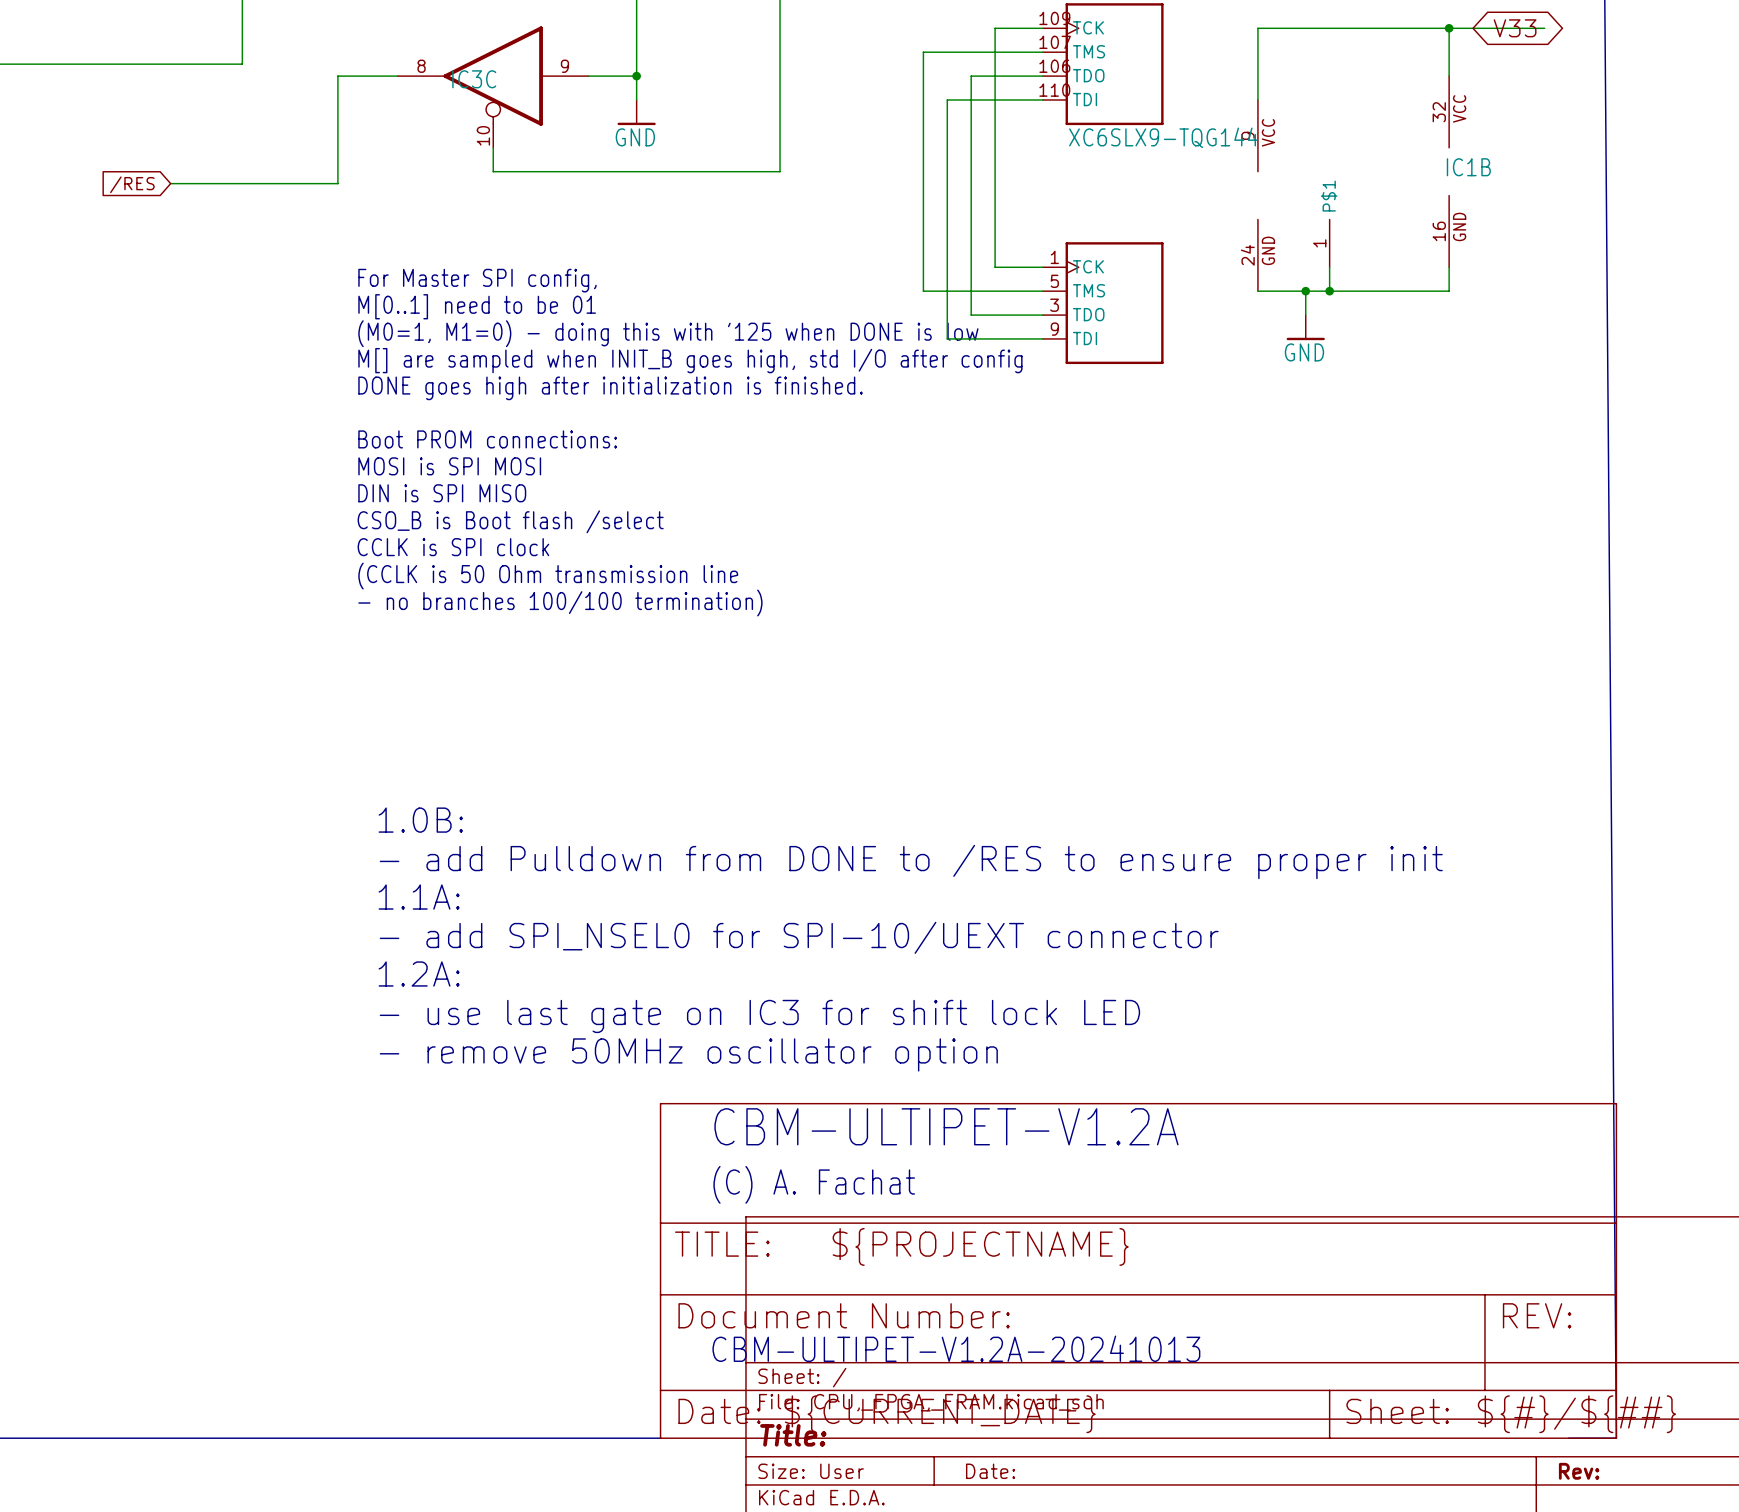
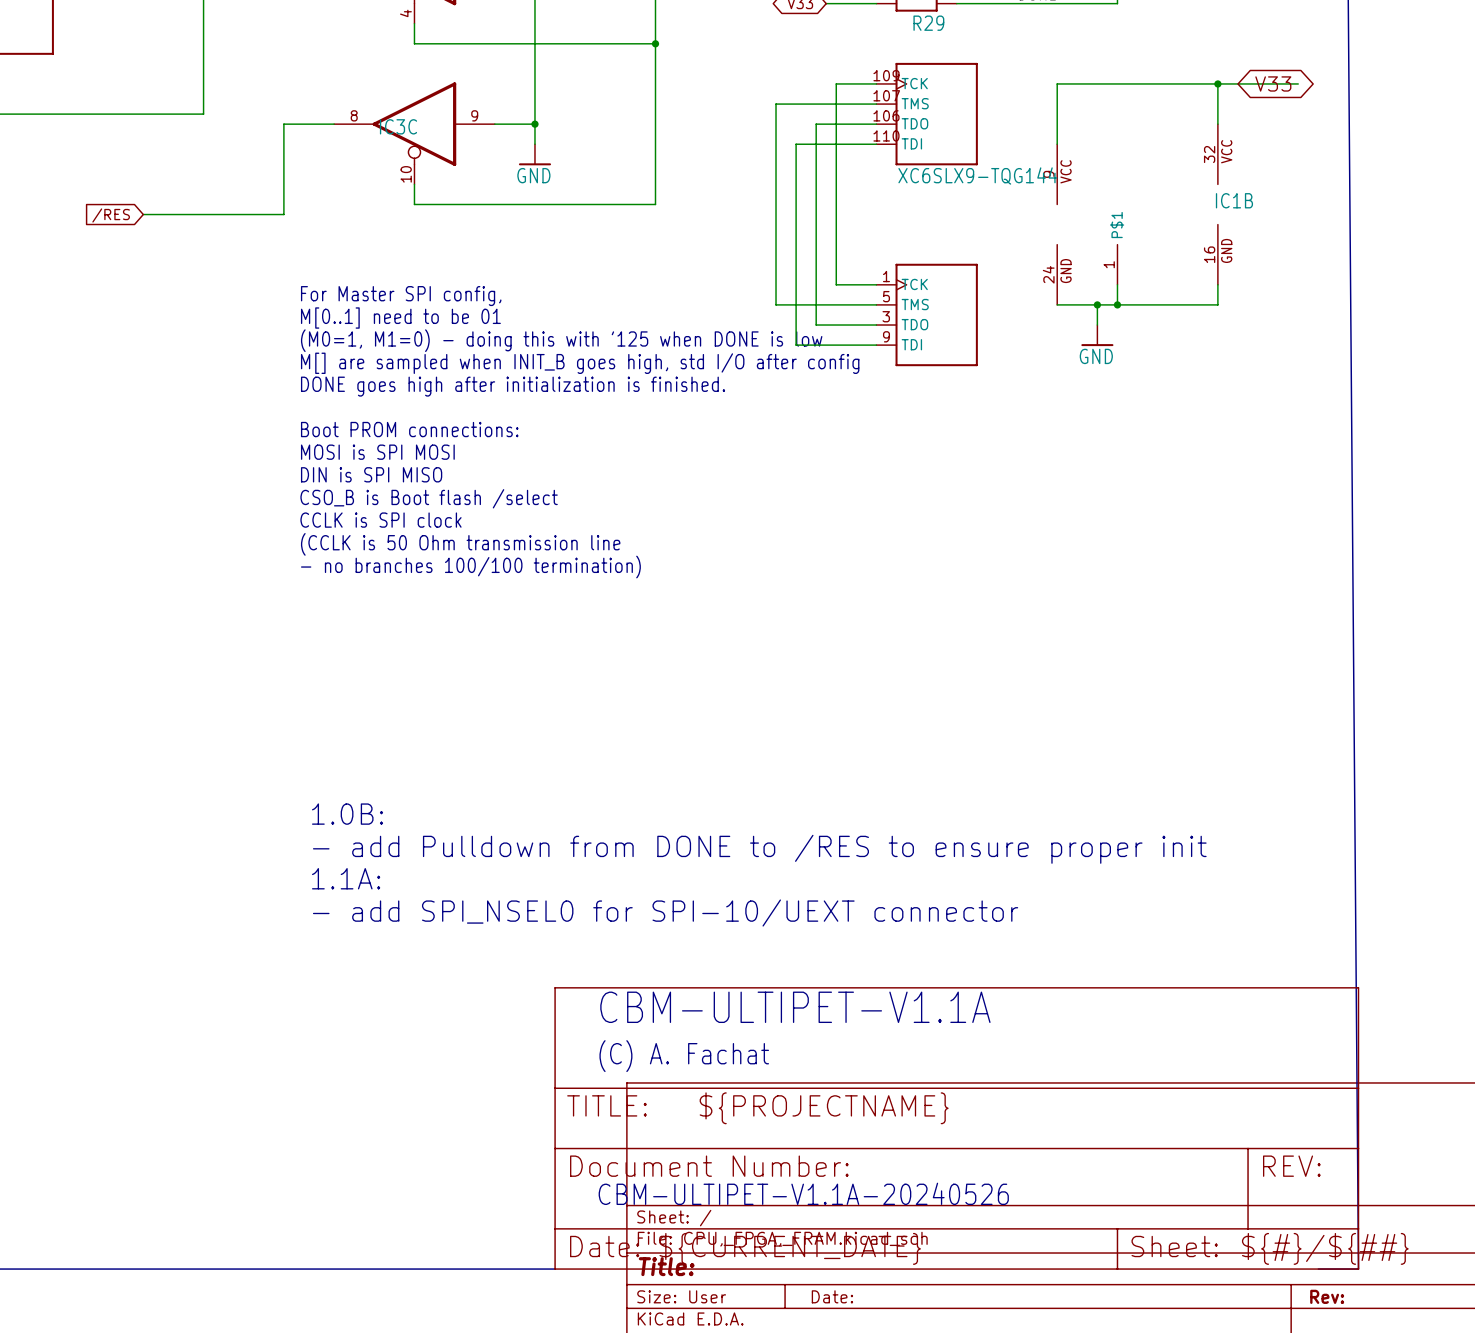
text: 1.0B: (420, 820) -> none
text: - add Pulldown from DONE to /RES to ensure proper init (911, 861) -> none
text: 1.1A: (419, 897) -> 1.0B: (347, 814)
text: - add SPI_NSEL0 for SPI-10/UEXT connector (799, 937) -> - add Pulldown from DONE to /RES to ensure proper init (759, 849)
text: 1.2A: (419, 974) -> 1.1A: (346, 878)
text: - use last gate on IC3 for shift lock LED (759, 1016) -> - add SPI_NSEL0 for SPI-10/UEXT connector (665, 913)
text: - remove 50MHz oscillator option (688, 1054) -> none
text: CBM-ULTIPET-V1.2A (946, 1126) -> CBM-ULTIPET-V1.1A (795, 1007)
text: CBM-ULTIPET-V1.2A-20241013 (956, 1348) -> CBM-ULTIPET-V1.1A-20240526 (803, 1193)

